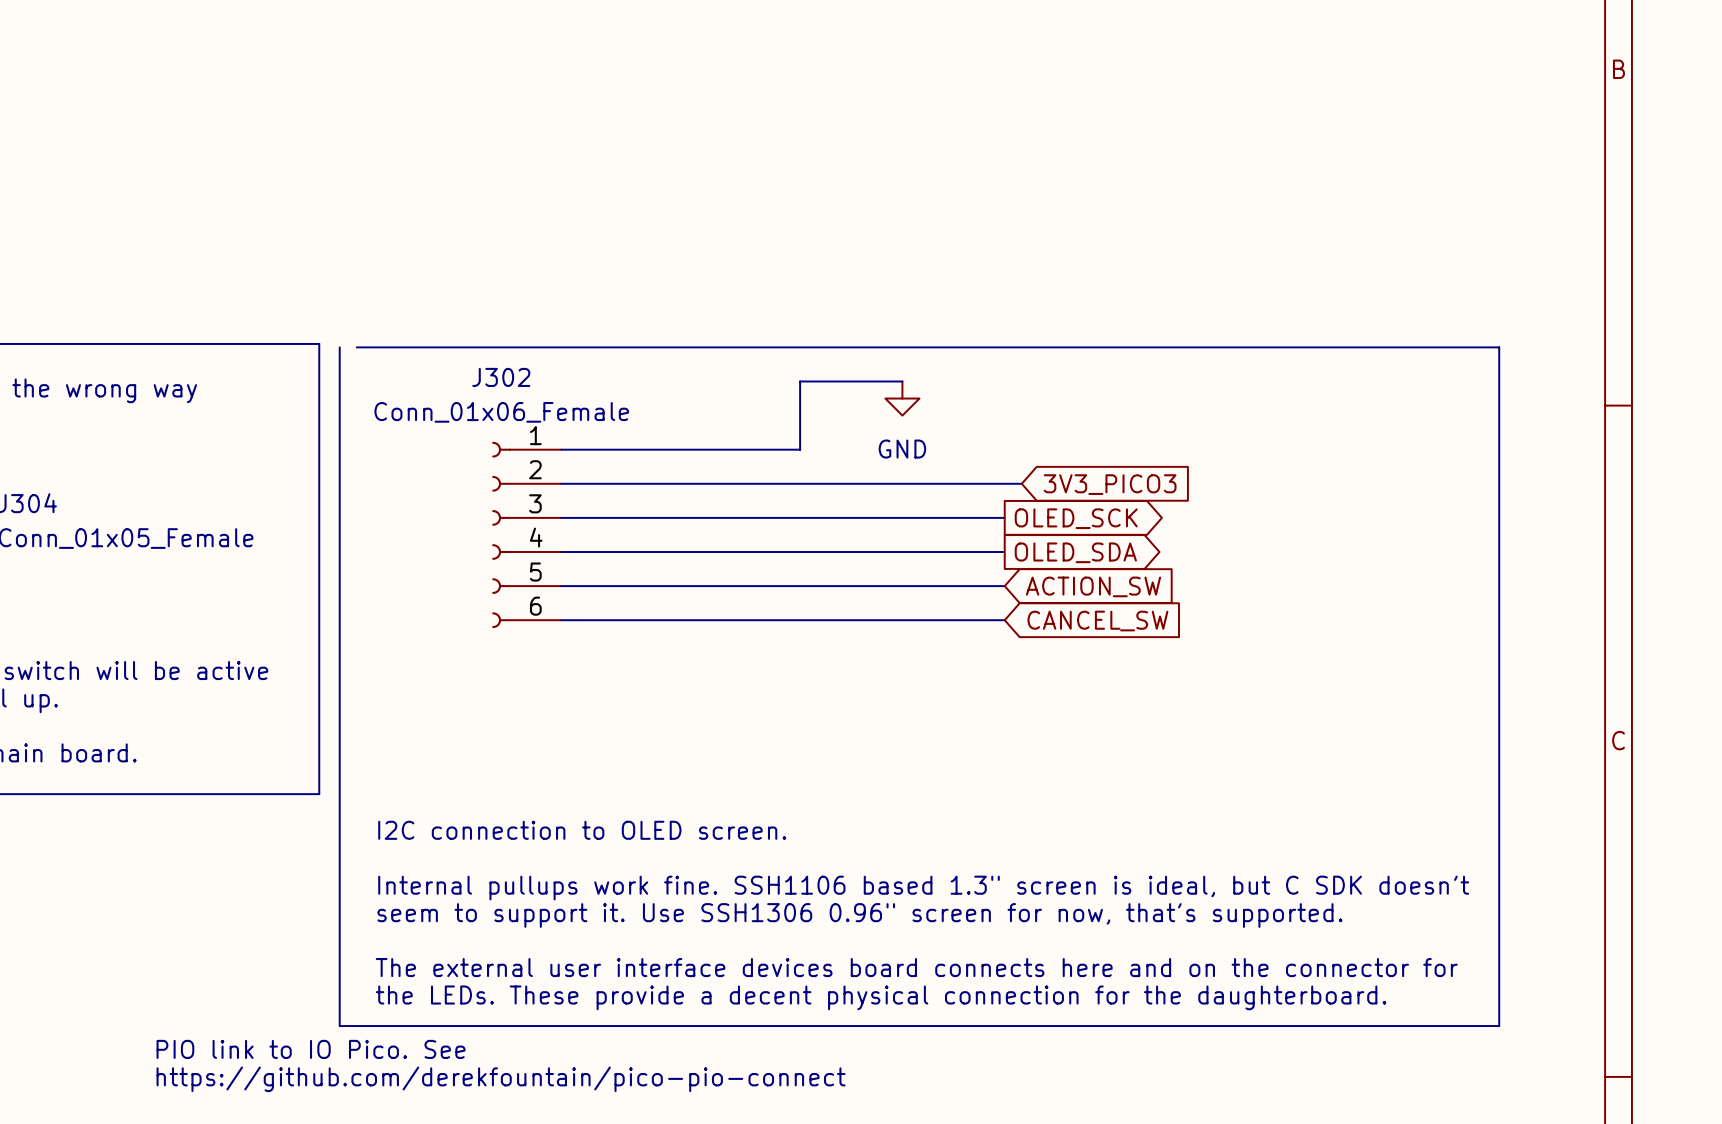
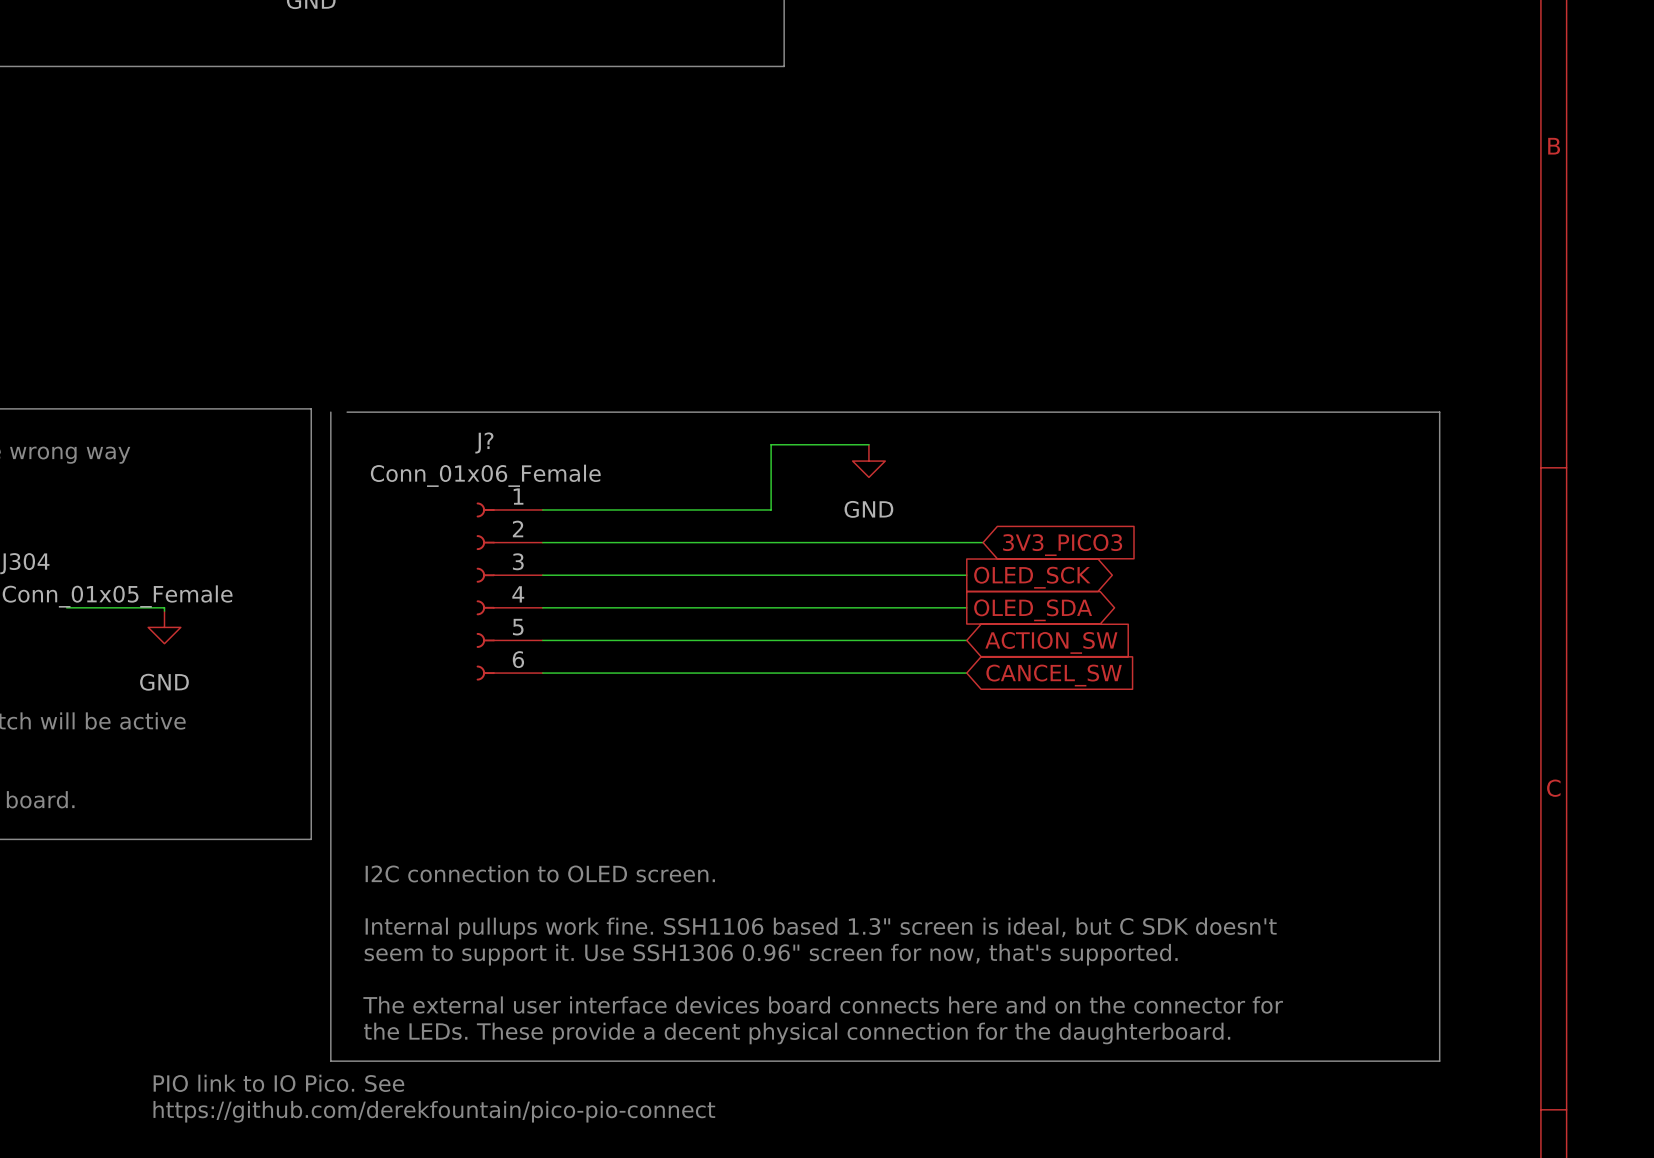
J302 name: J302 (501, 377) -> J? (484, 442)
wire: none -> (66, 607) (164, 607) (164, 611)
power symbol: none -> GND (164, 627)

